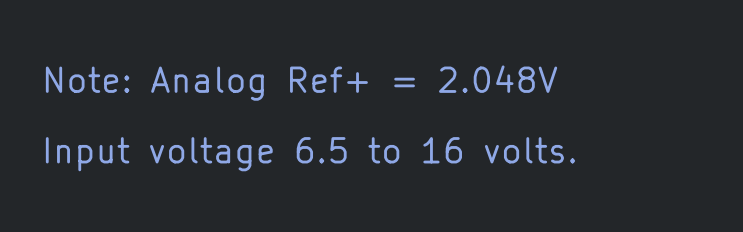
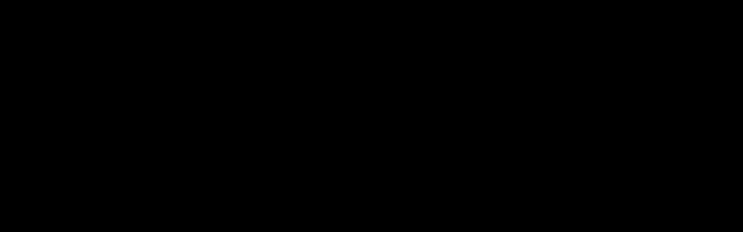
text: Note: Analog Ref+ = 2.048V (301, 83) -> none
text: Input voltage 6.5 to 16 volts. (310, 154) -> none

